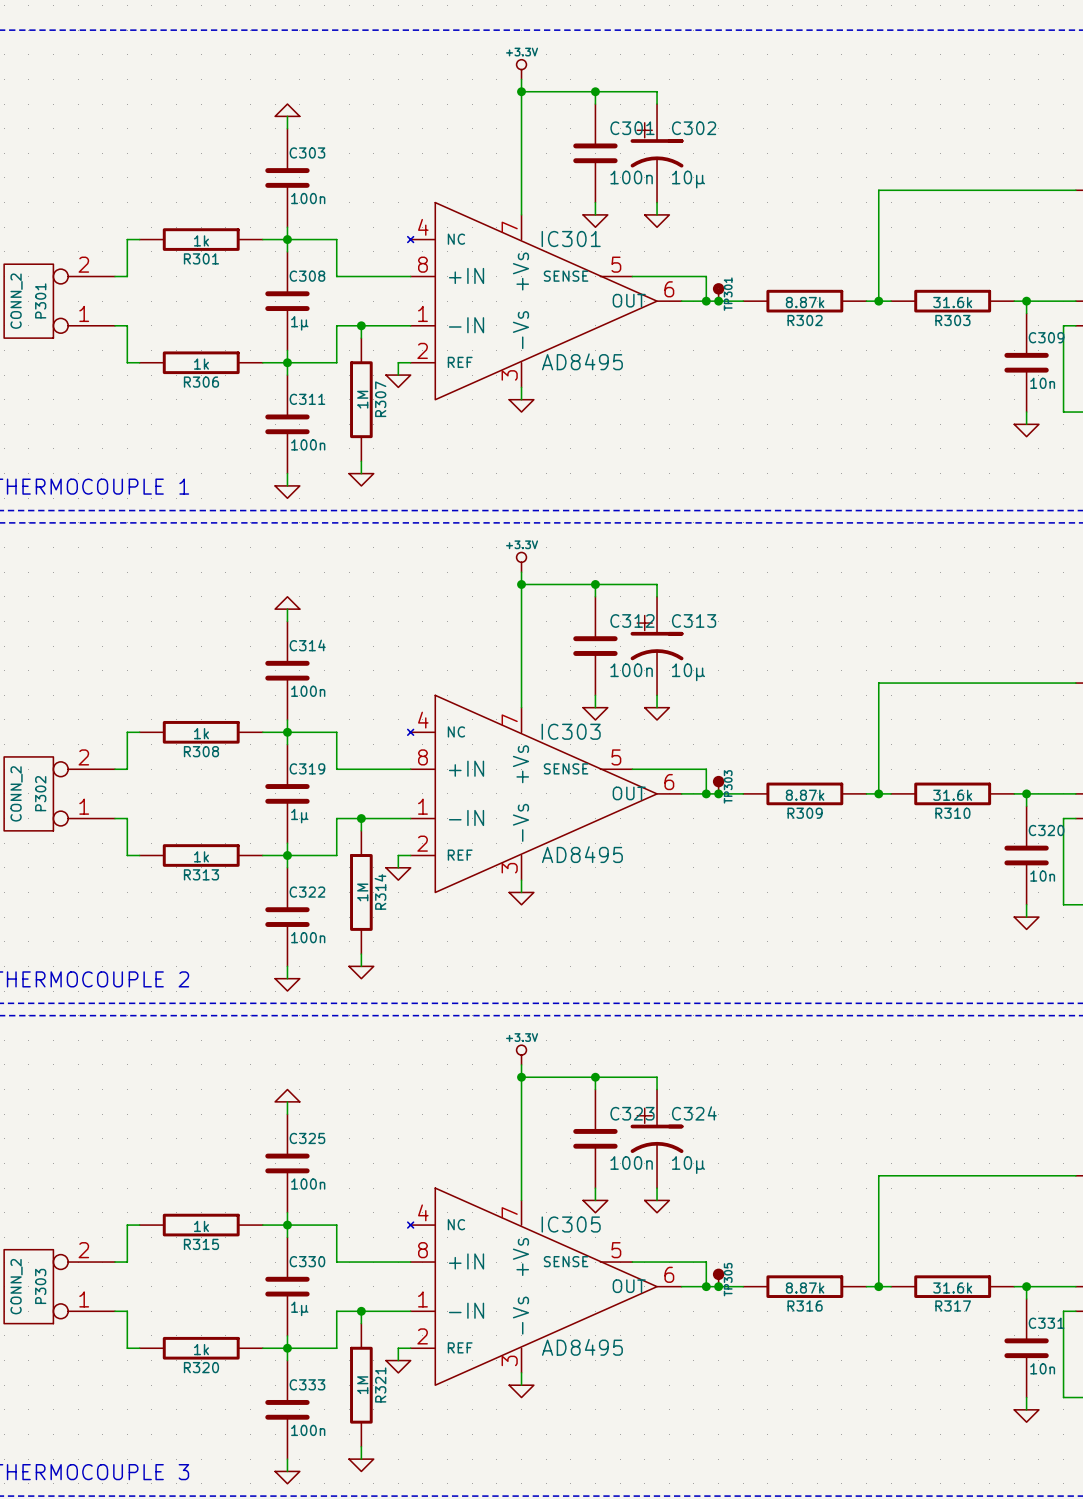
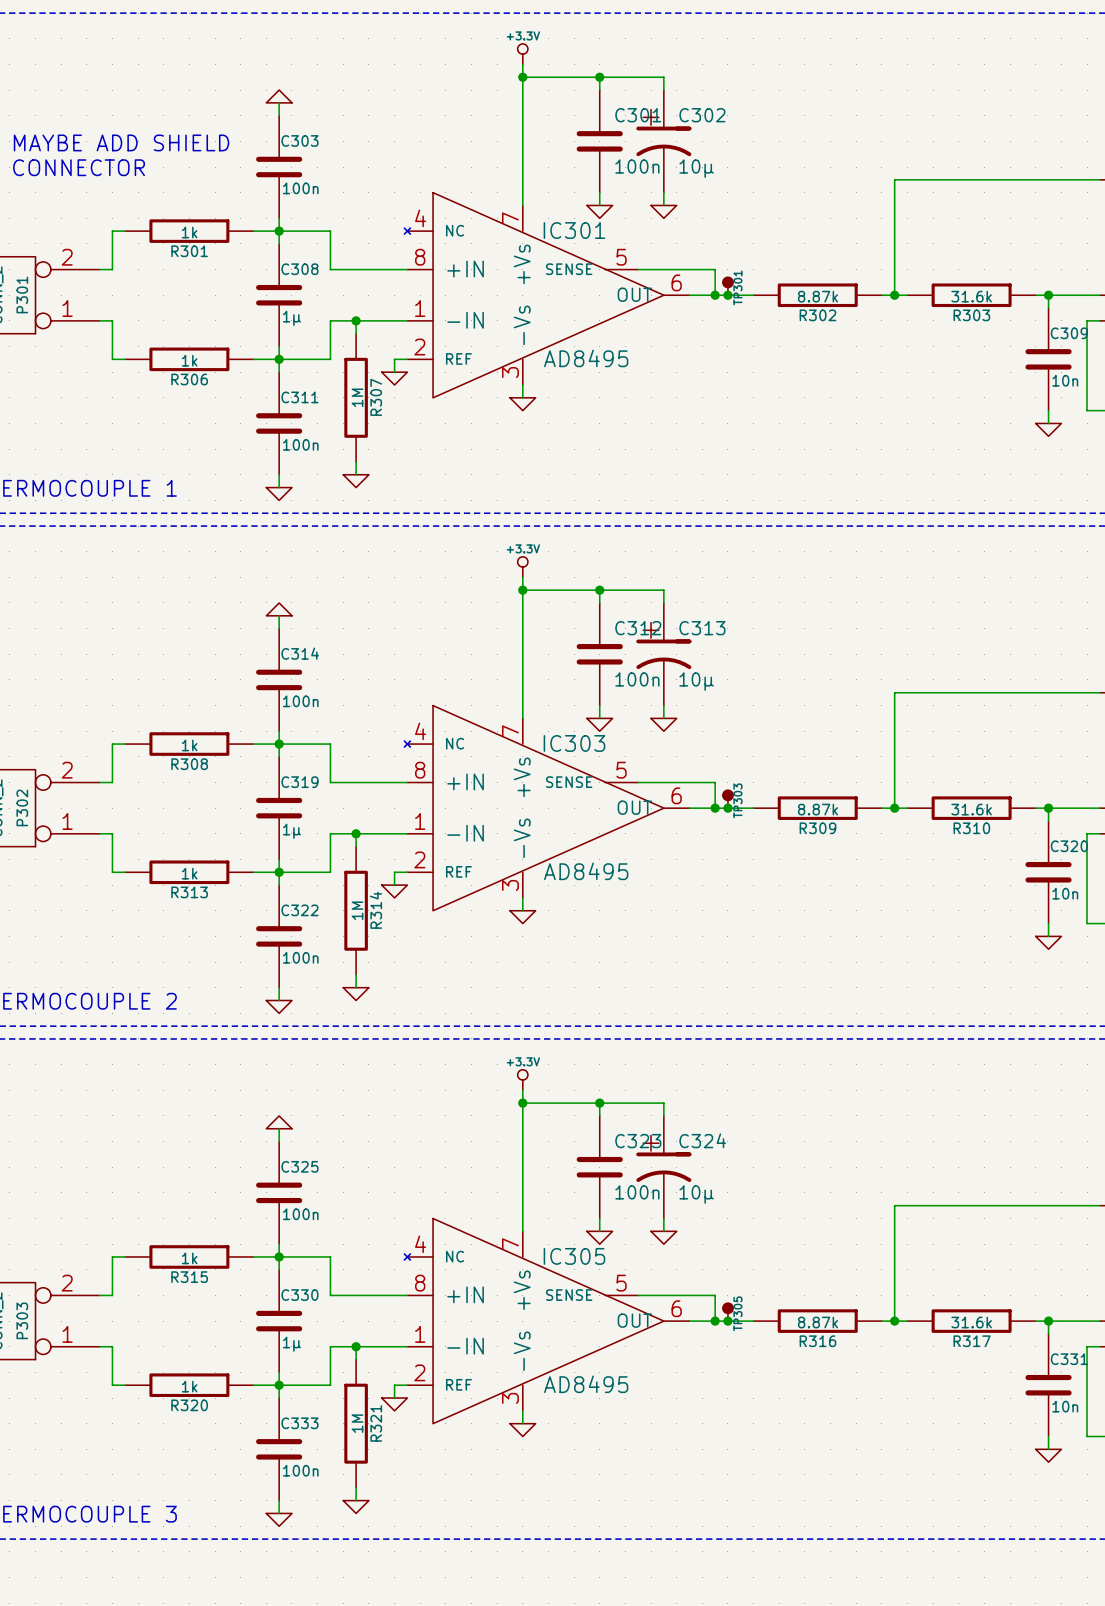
text: none -> MAYBE ADD SHIELD (121, 142)
text: none -> CONNECTOR (79, 167)

